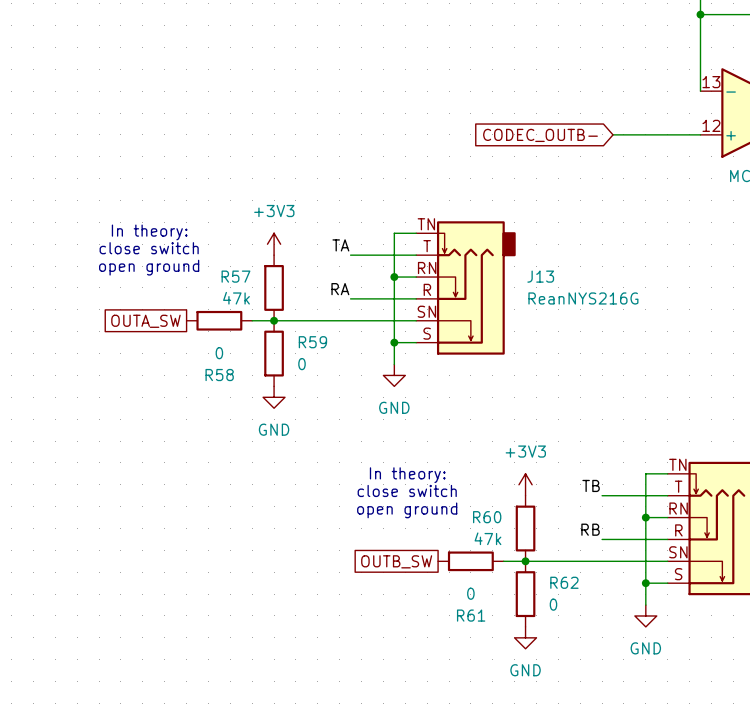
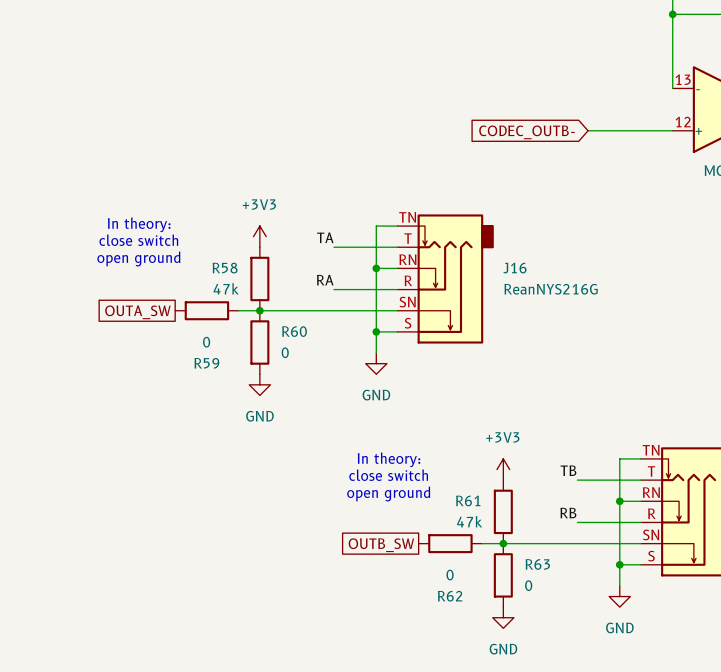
R57 name: R57 (235, 276) -> R58 (225, 268)
J13 name: J13 (540, 276) -> J16 (514, 268)
R59 name: R59 (312, 342) -> R60 (294, 331)
R58 name: R58 (219, 375) -> R59 (206, 363)
R60 name: R60 (487, 517) -> R61 (468, 500)
R62 name: R62 (564, 582) -> R63 (537, 564)
R61 name: R61 (471, 615) -> R62 (450, 596)

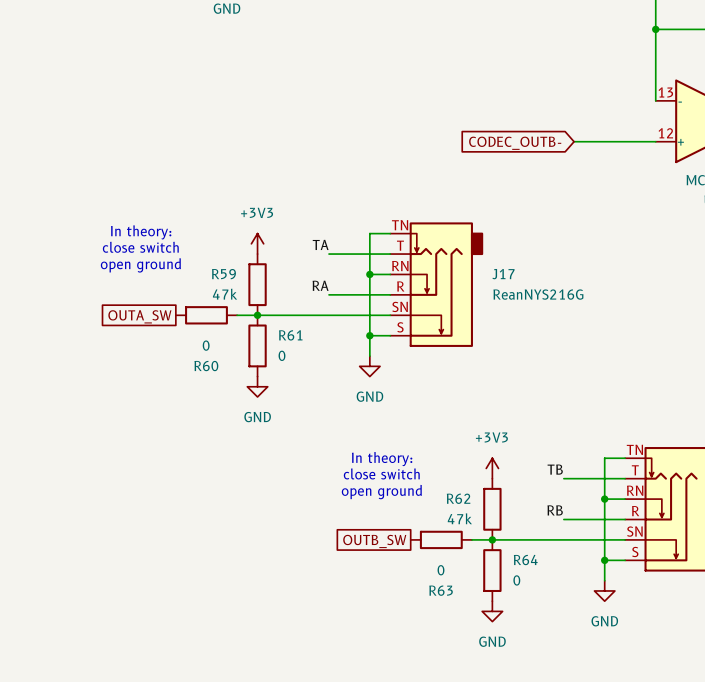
R58 name: R58 (225, 268) -> R59 (223, 274)
J16 name: J16 (514, 268) -> J17 (503, 274)
R60 name: R60 (294, 331) -> R61 (290, 335)
R59 name: R59 (206, 363) -> R60 (206, 366)
R61 name: R61 (468, 500) -> R62 (458, 498)
R63 name: R63 (537, 564) -> R64 (525, 560)
R62 name: R62 (450, 596) -> R63 (441, 590)

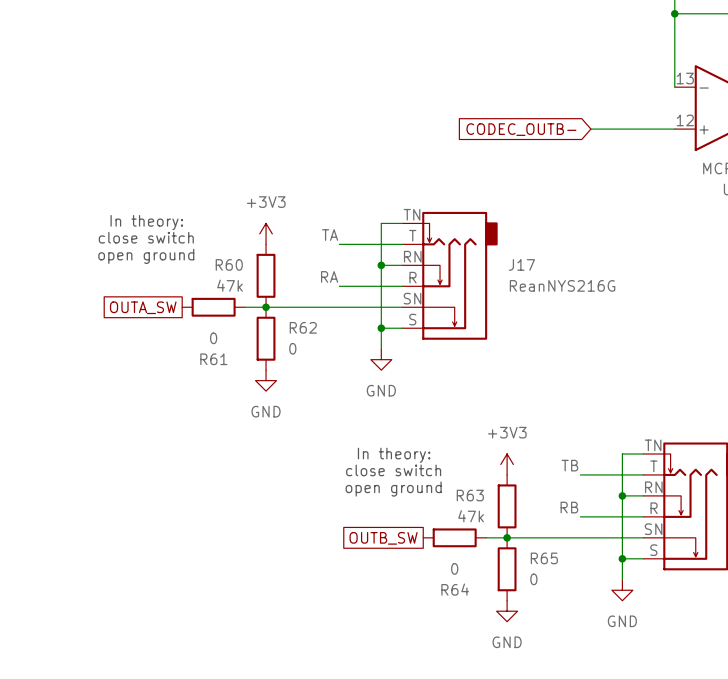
R59 name: R59 (223, 274) -> R60 (229, 264)
R61 name: R61 (290, 335) -> R62 (303, 327)
R60 name: R60 (206, 366) -> R61 (213, 359)
R62 name: R62 (458, 498) -> R63 (470, 495)
R64 name: R64 (525, 560) -> R65 (544, 558)
R63 name: R63 (441, 590) -> R64 (455, 589)

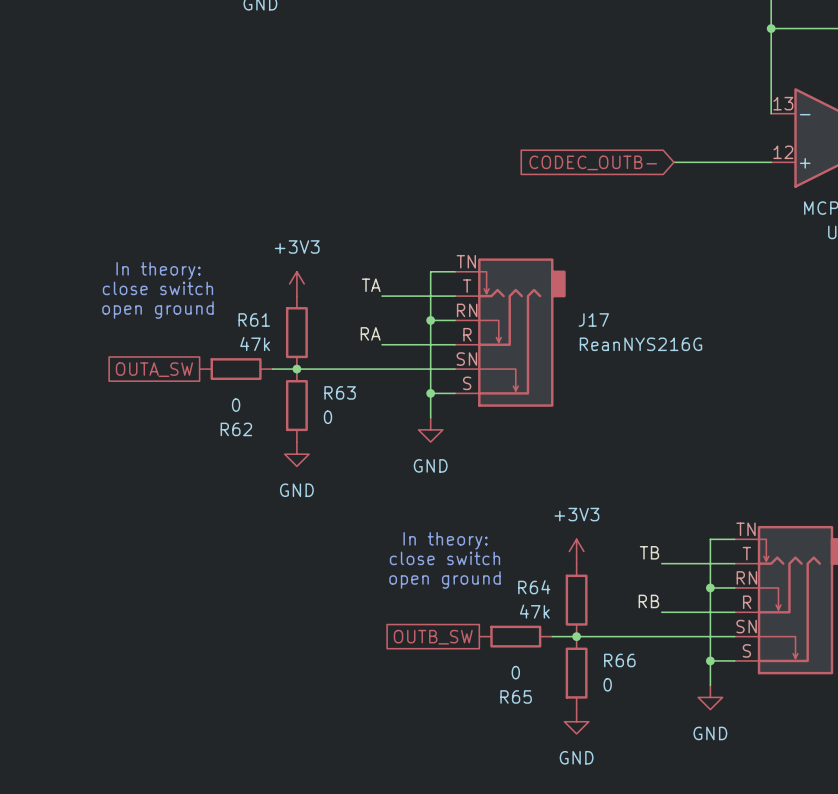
R60 name: R60 (229, 264) -> R61 (254, 319)
R62 name: R62 (303, 327) -> R63 (340, 392)
R61 name: R61 (213, 359) -> R62 (236, 429)
R63 name: R63 (470, 495) -> R64 (534, 587)
R65 name: R65 (544, 558) -> R66 (619, 660)
R64 name: R64 (455, 589) -> R65 (516, 696)

